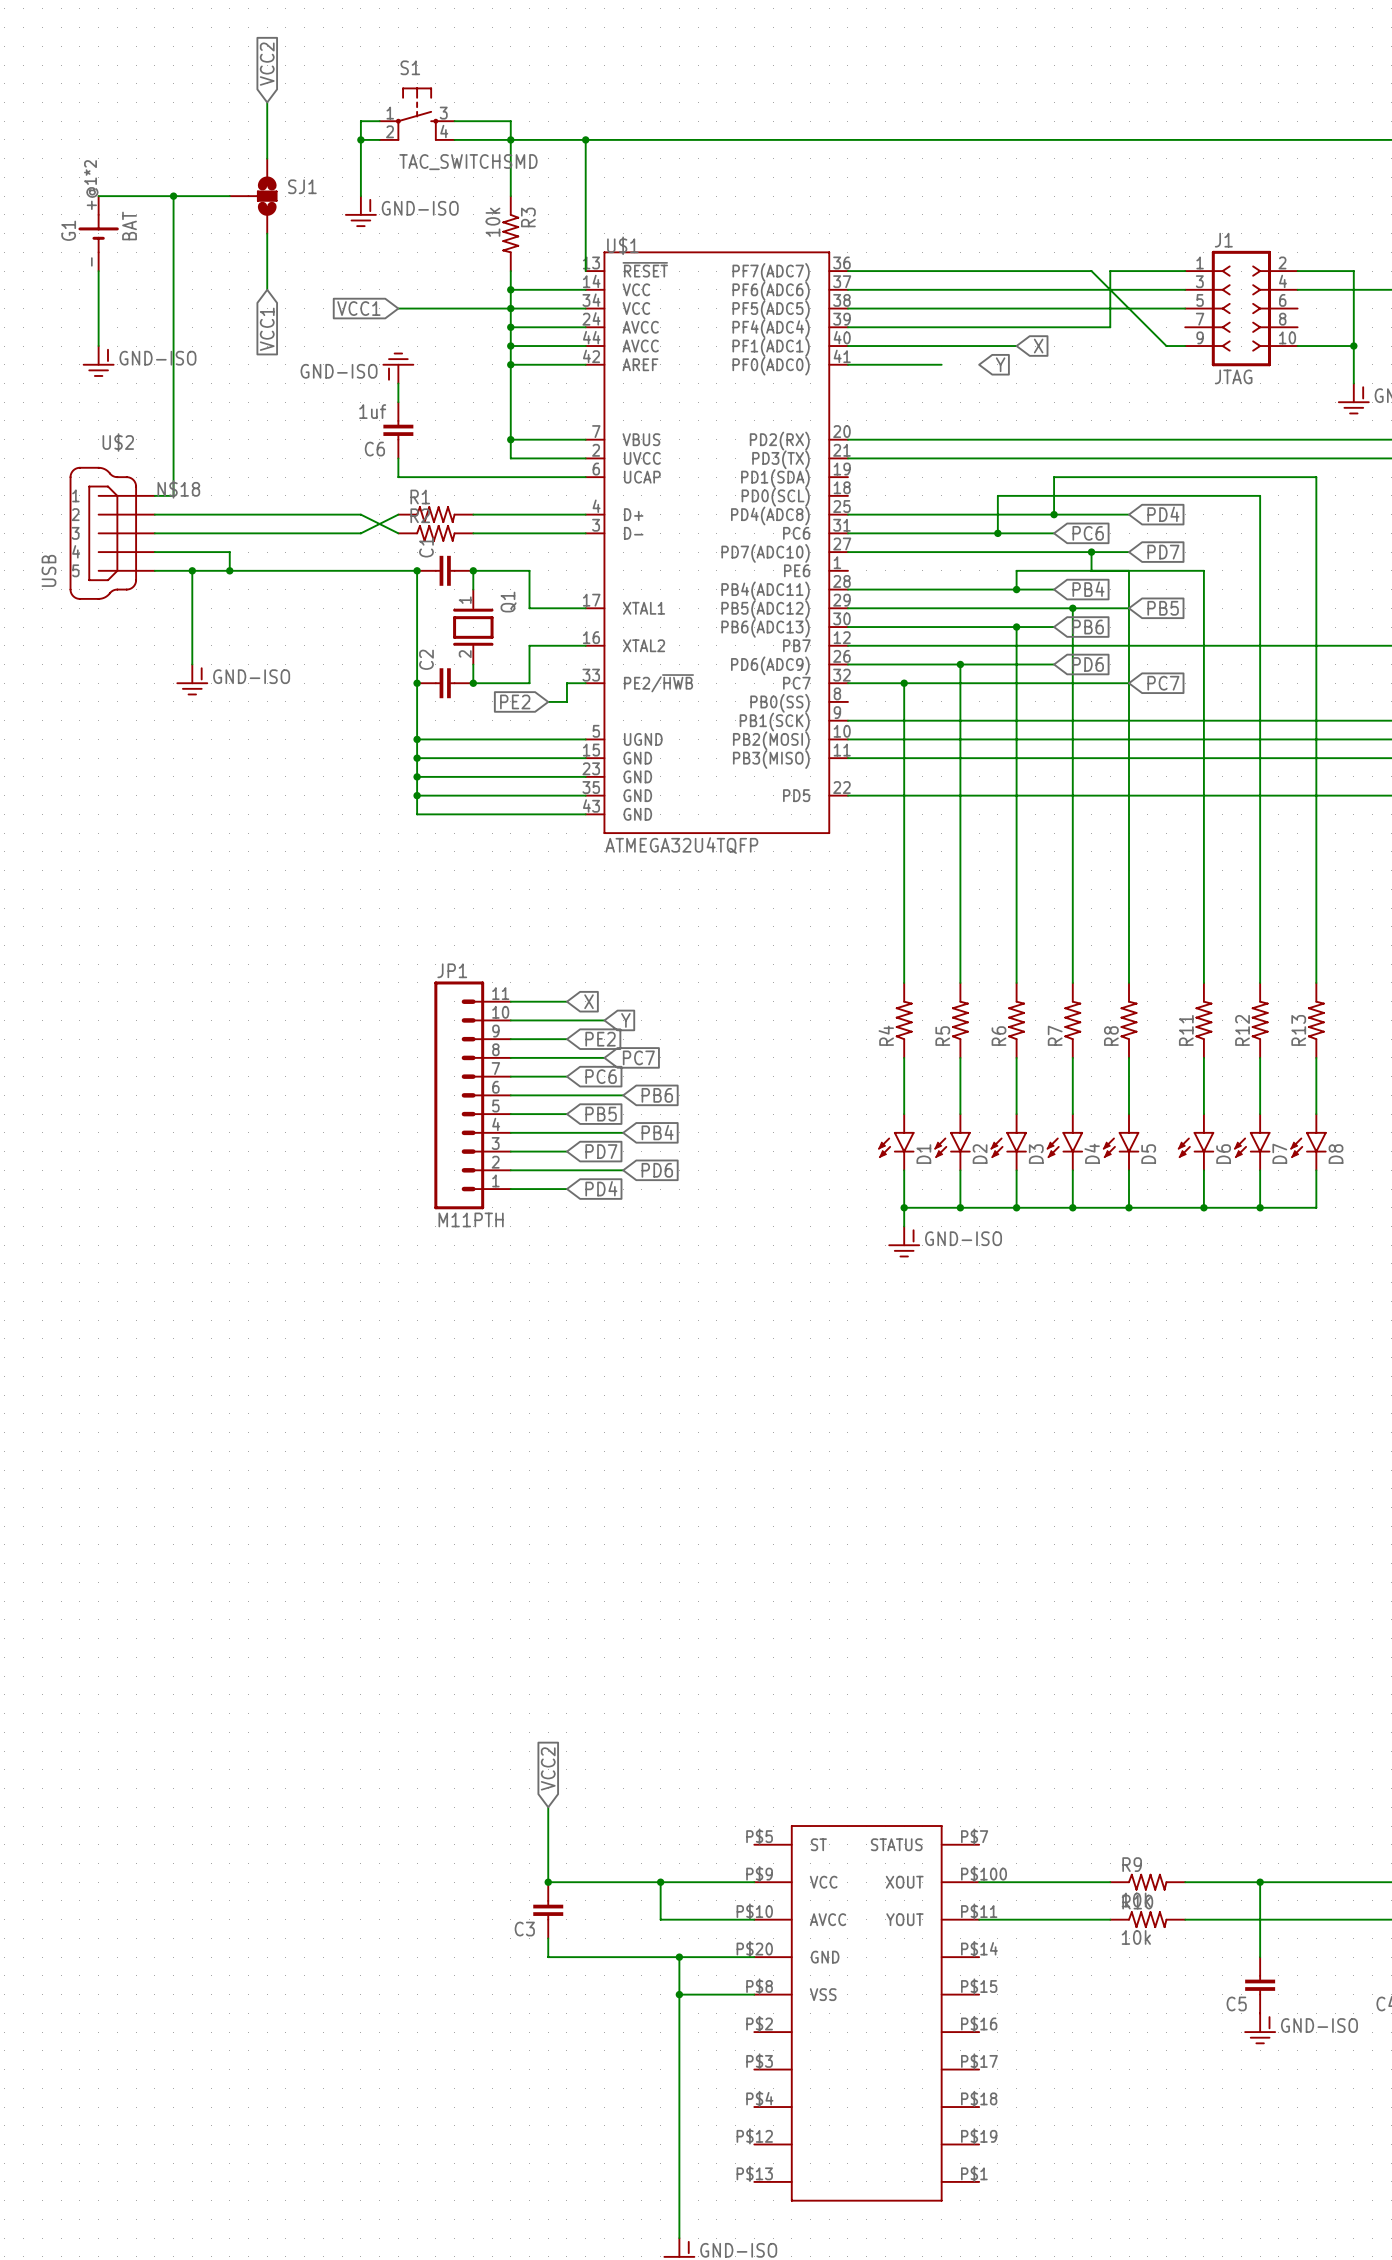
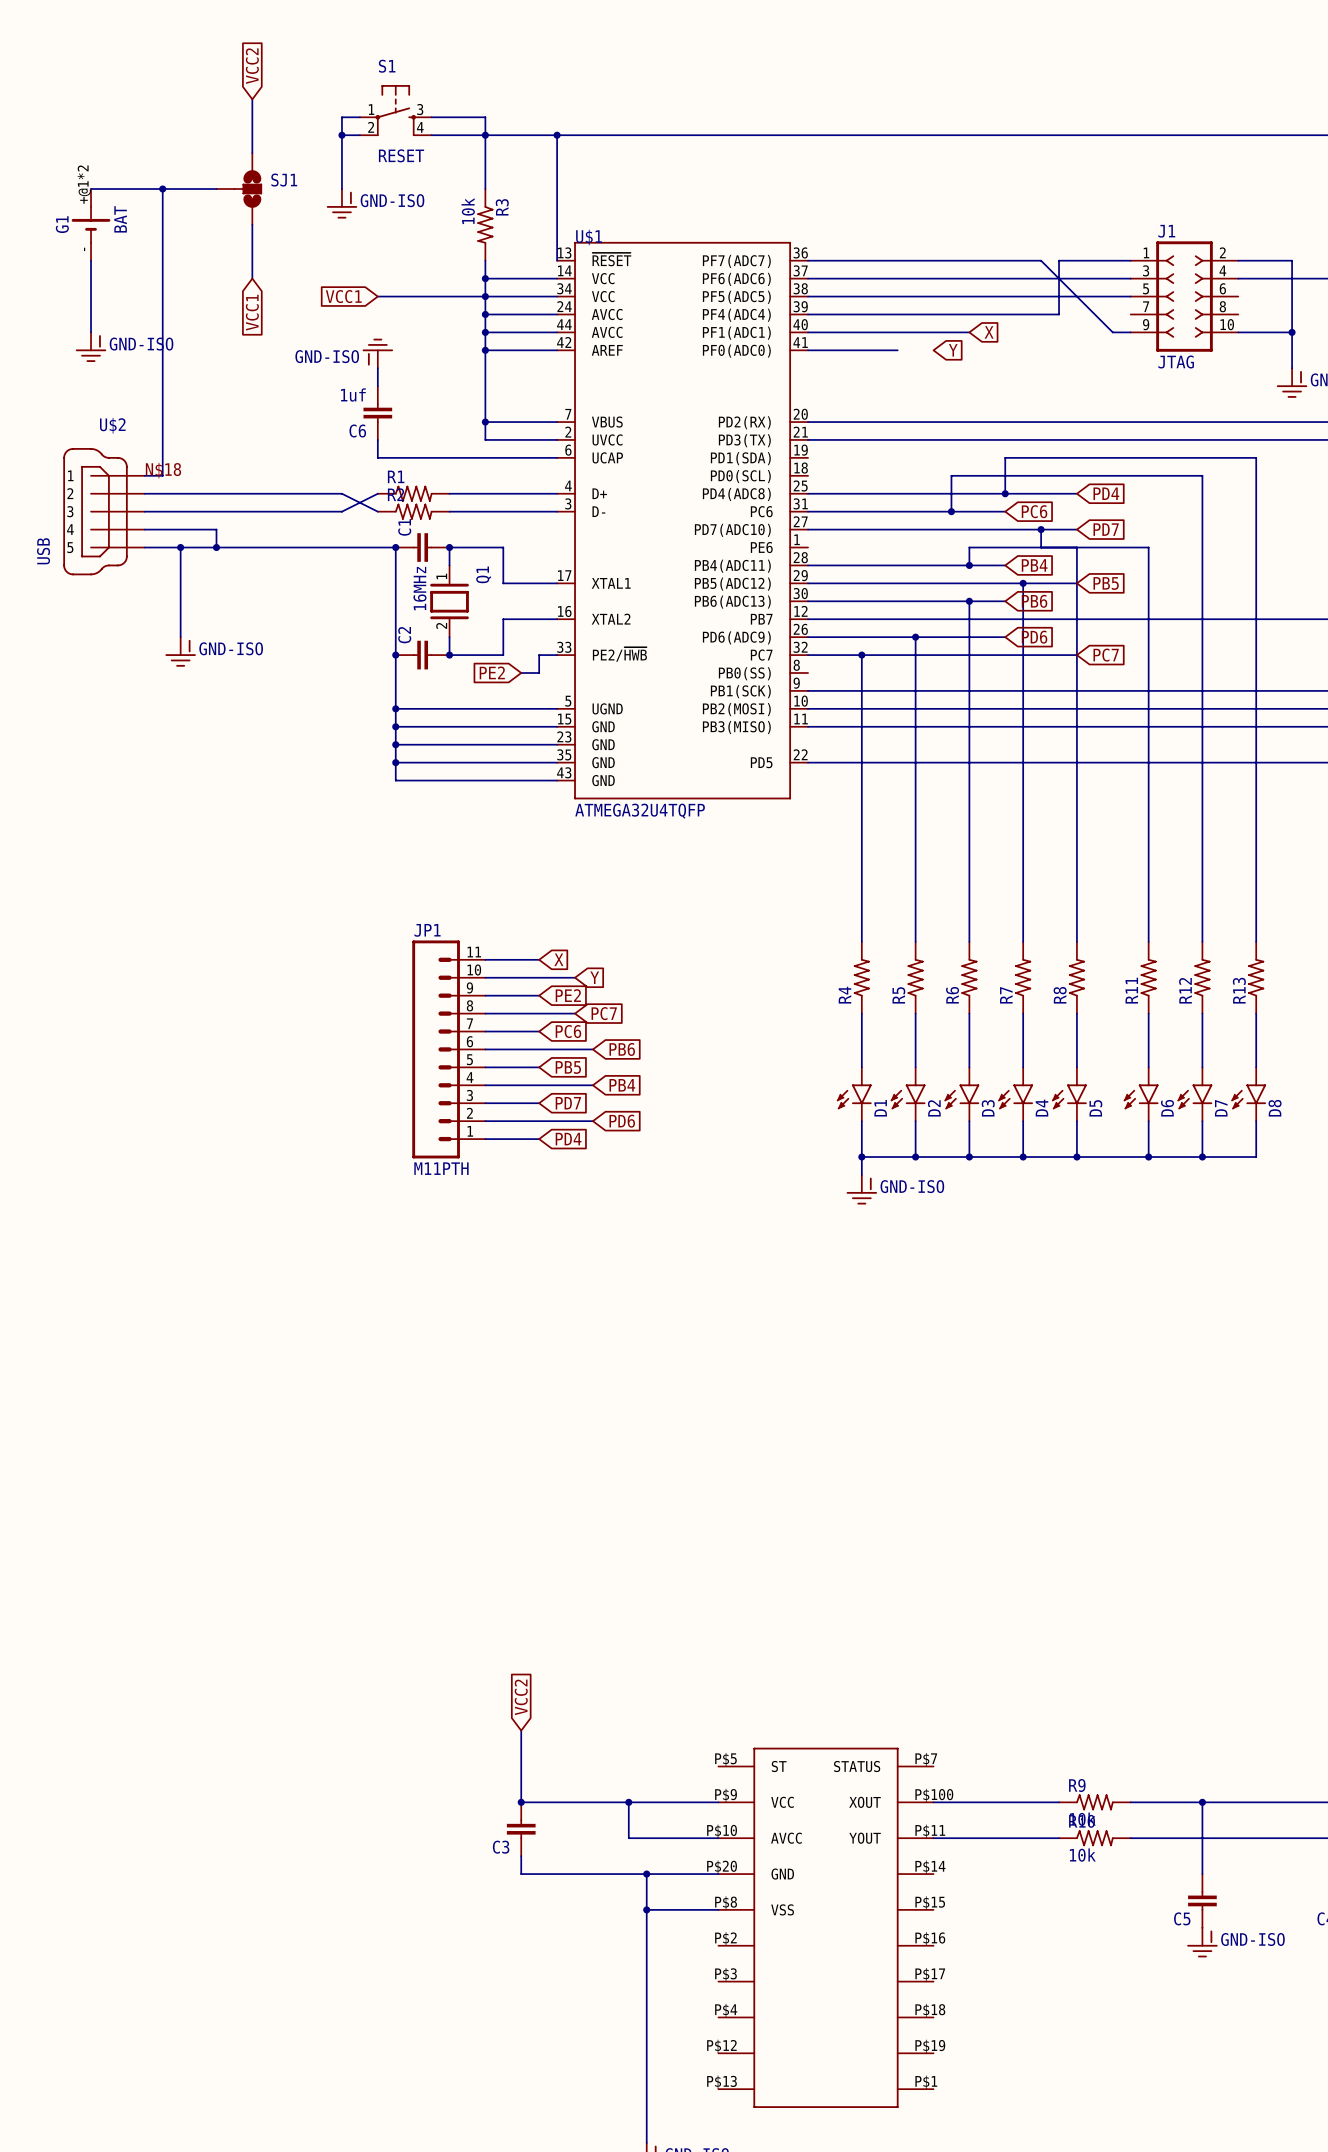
S1 value: TAC_SWITCHSMD (468, 162) -> RESET (401, 155)
Q1 value: none -> 16MHz (419, 588)

